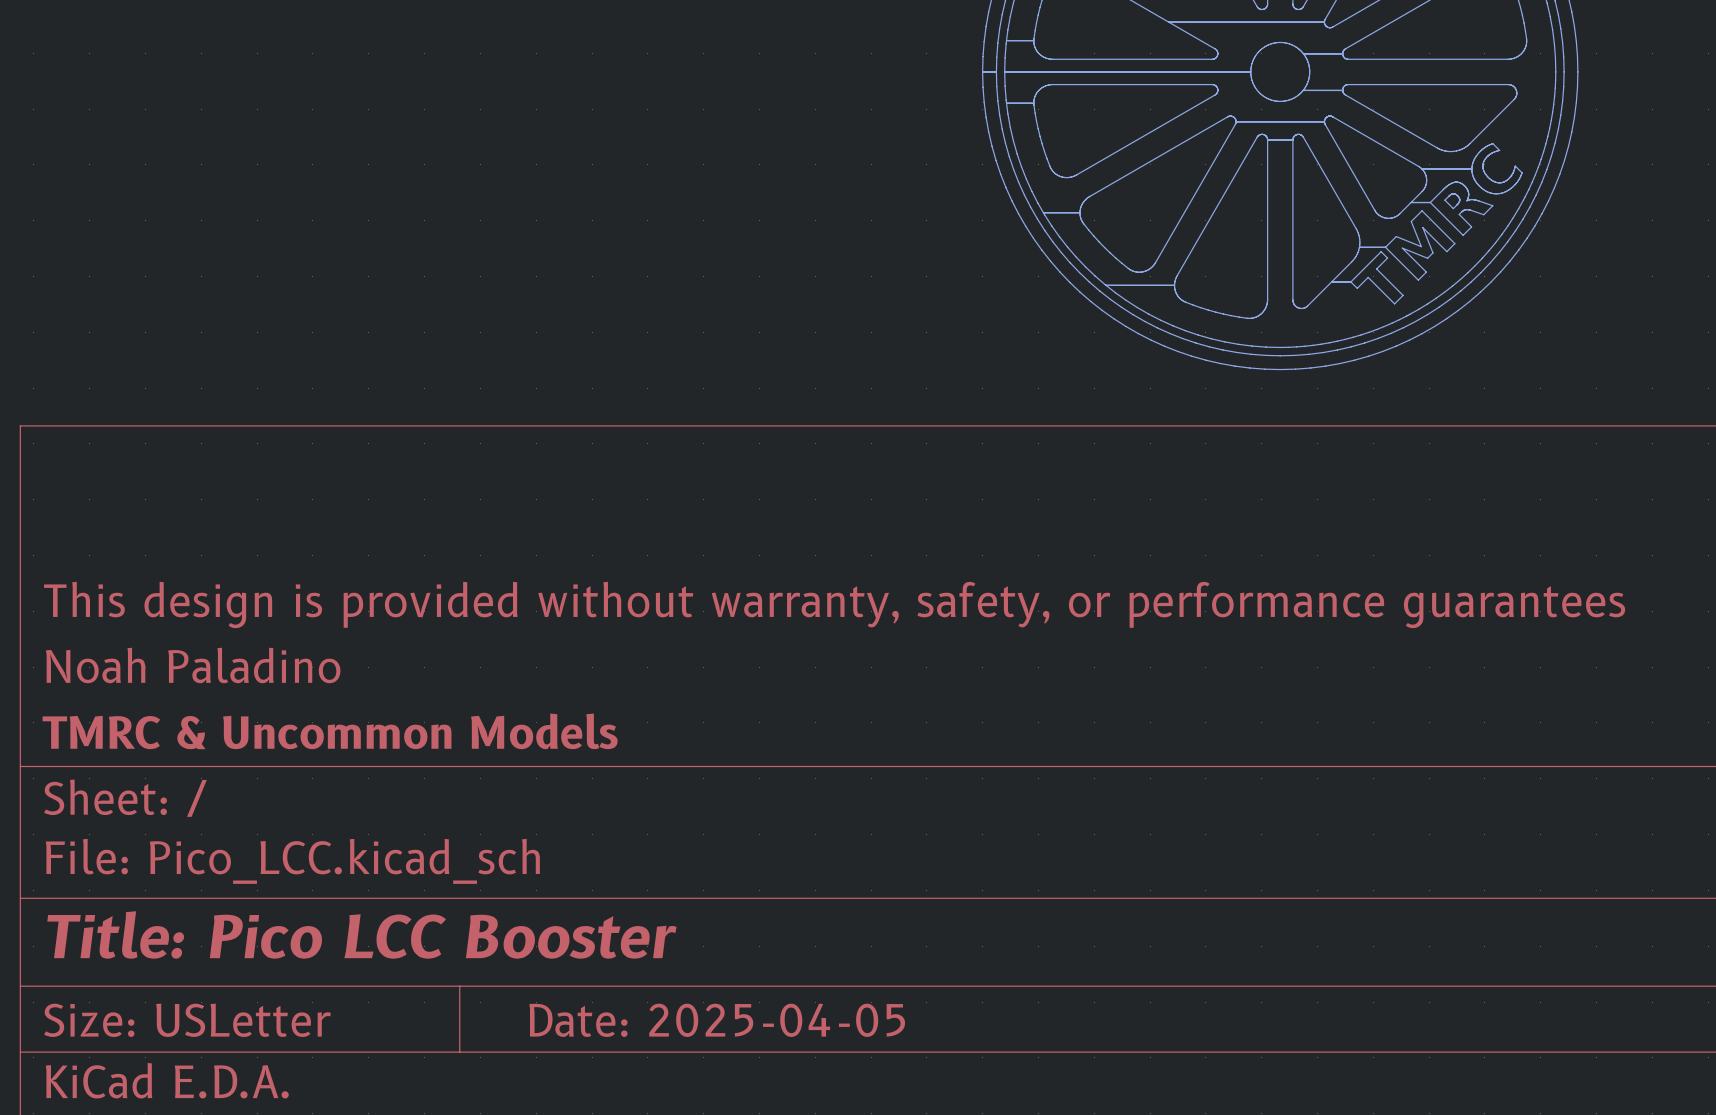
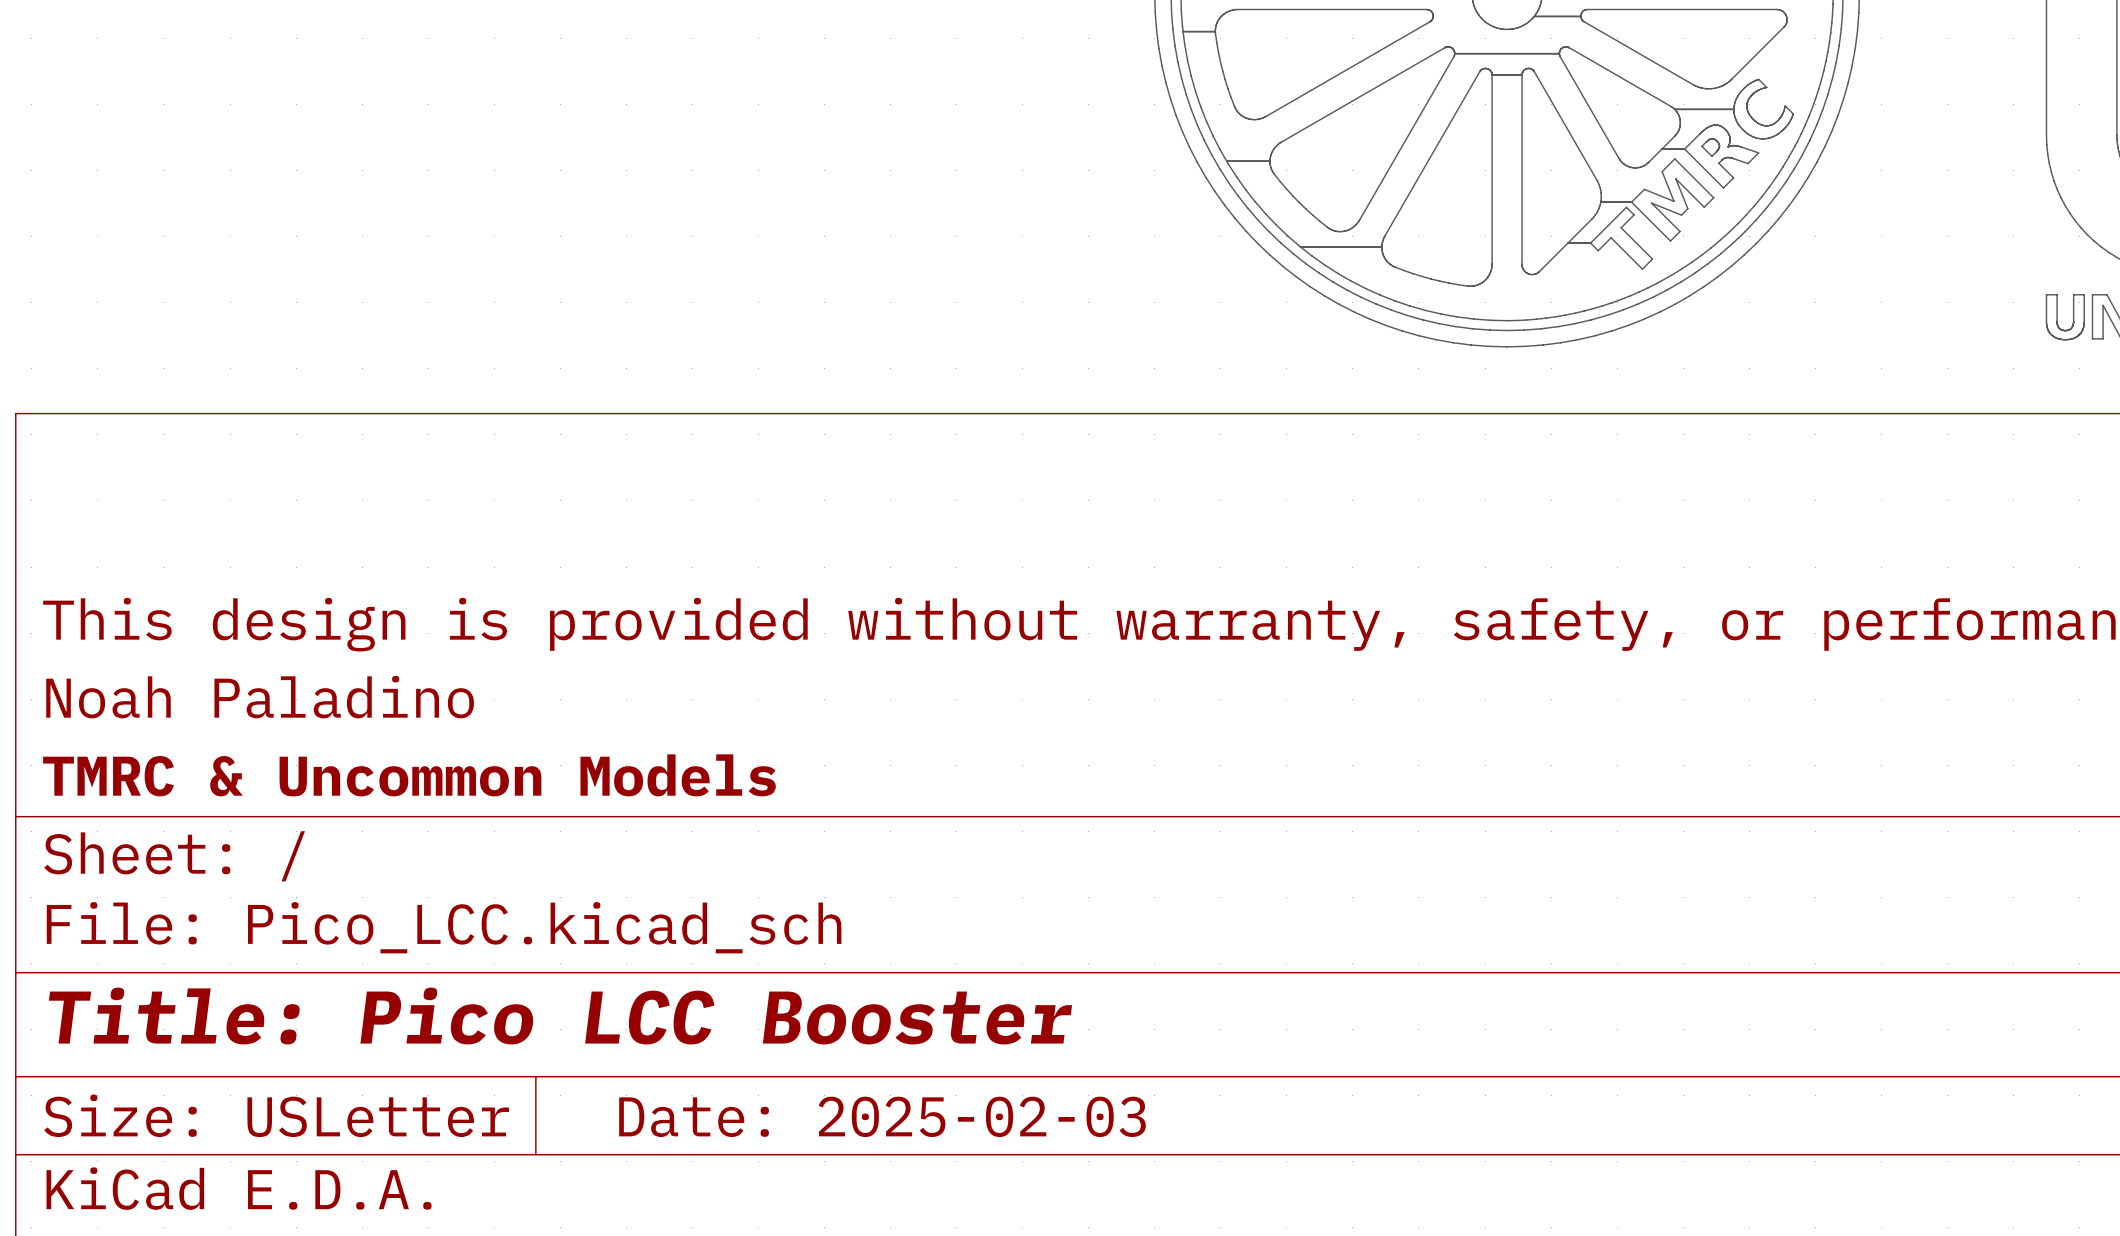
title block: Date: 2025-04-05 (717, 1020) -> Date: 2025-02-03 (882, 1116)

